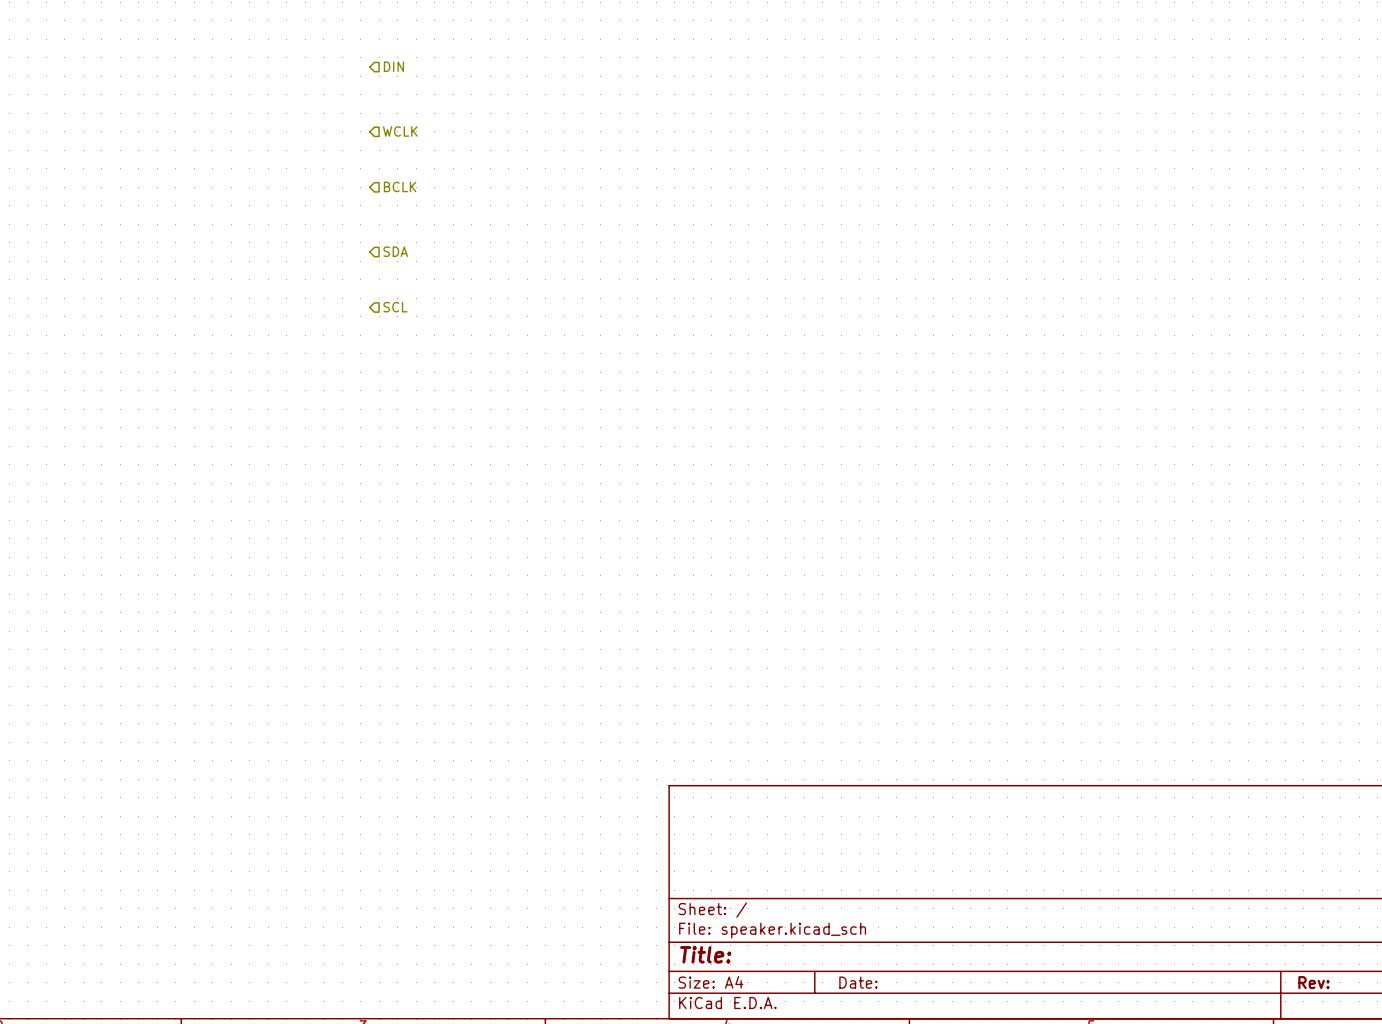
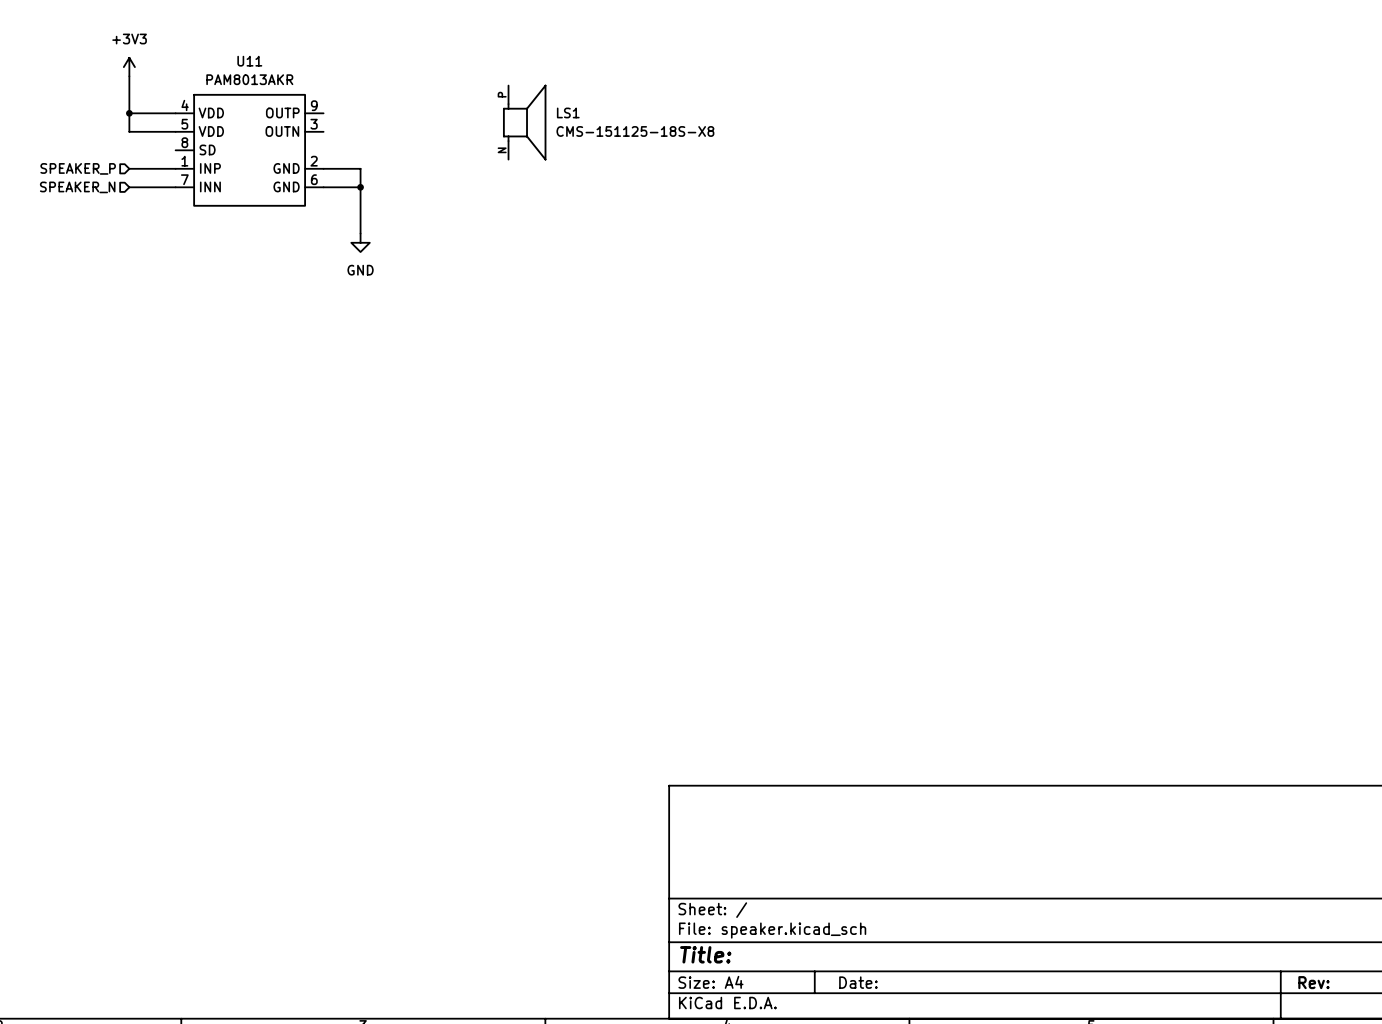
hierarchical label: DIN (393, 66) -> none
power symbol: none -> +3V3 (129, 67)
wire: none -> (129, 76) (129, 131) (175, 131)
wire: none -> (129, 113) (175, 113)
junction: none -> (129, 113)
LS1: none -> CMS-151125-18S-X8 (524, 122)
hierarchical label: WCLK (400, 131) -> none
U11: none -> PAM8013AKR (249, 150)
hierarchical label: none -> SPEAKER_P (78, 168)
wire: none -> (129, 168) (175, 168)
wire: none -> (323, 168) (360, 168) (360, 233)
hierarchical label: BCLK (400, 186) -> none
hierarchical label: none -> SPEAKER_N (77, 187)
wire: none -> (129, 187) (175, 187)
wire: none -> (323, 187) (360, 187)
junction: none -> (360, 187)
power symbol: none -> GND (360, 242)
hierarchical label: SDA (395, 251) -> none
hierarchical label: SCL (395, 307) -> none

